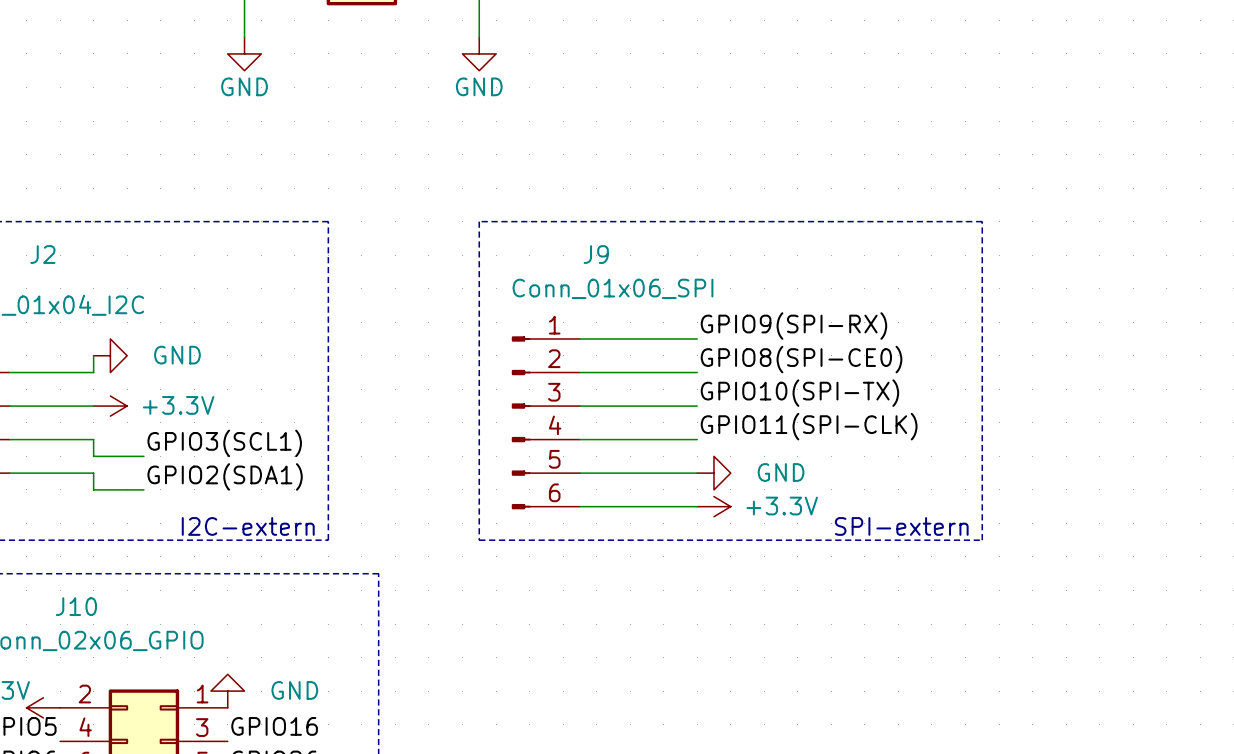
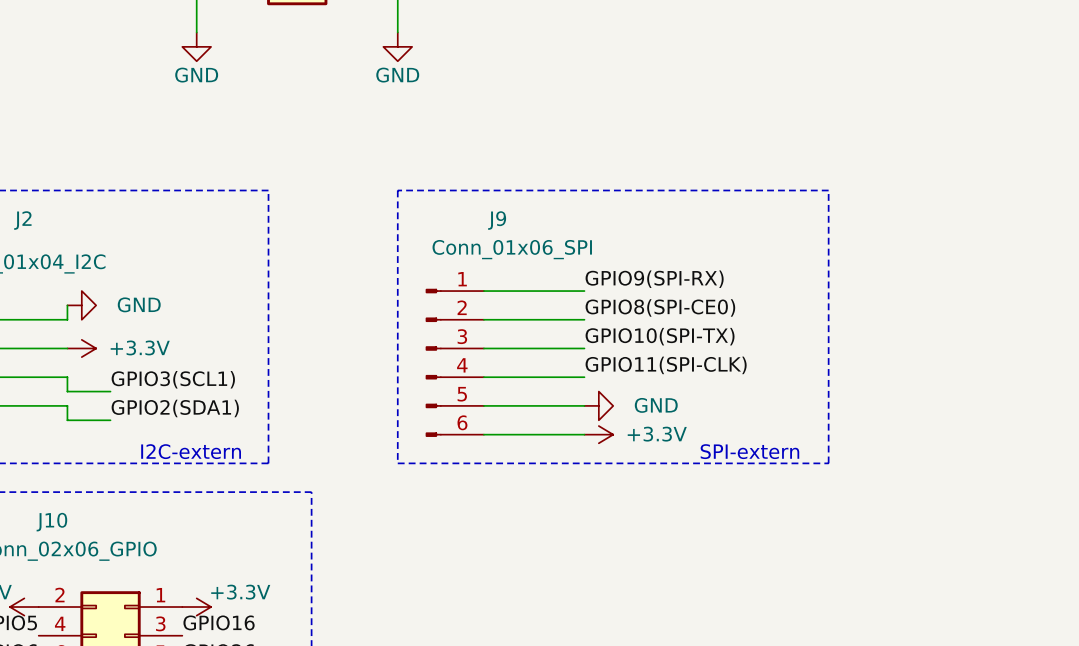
power symbol: GND (227, 691) -> none
power symbol: none -> +3.3V (196, 607)

